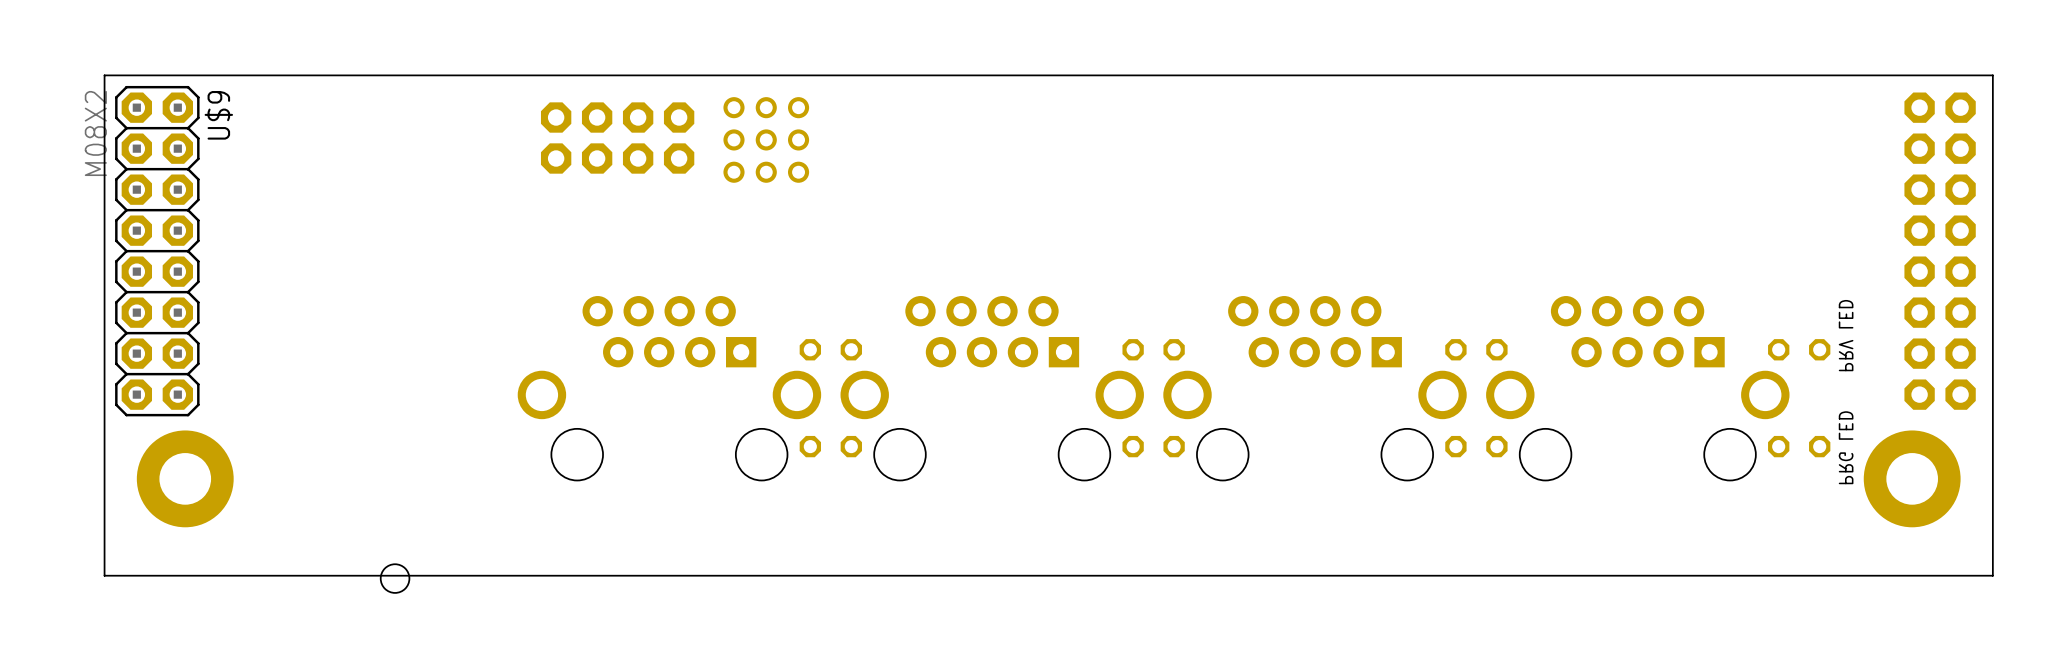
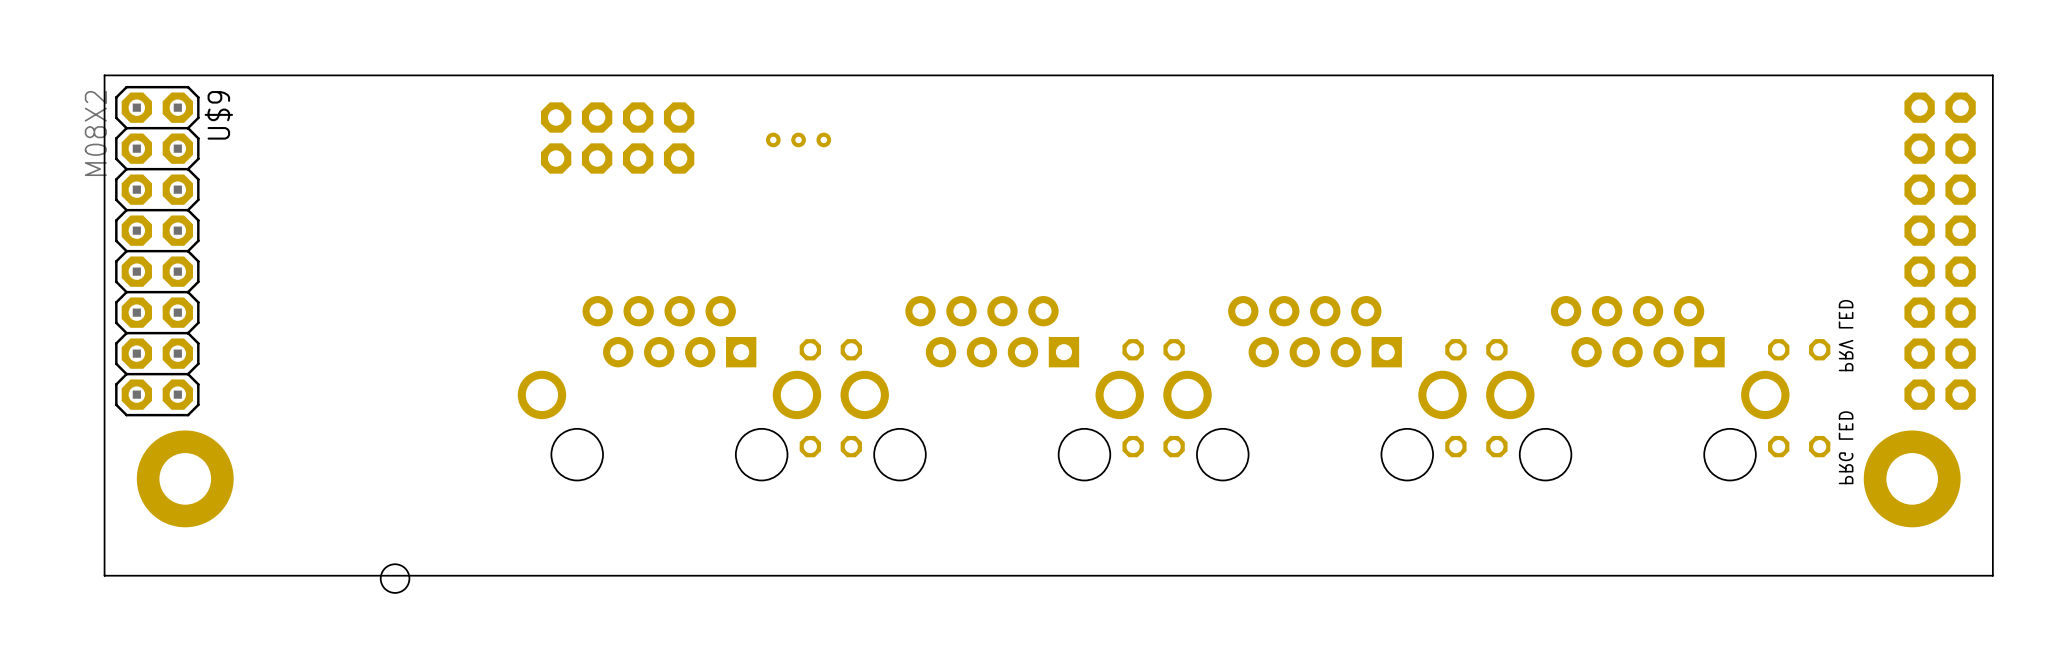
part: (766, 139) -> none
part: none -> (798, 139)

